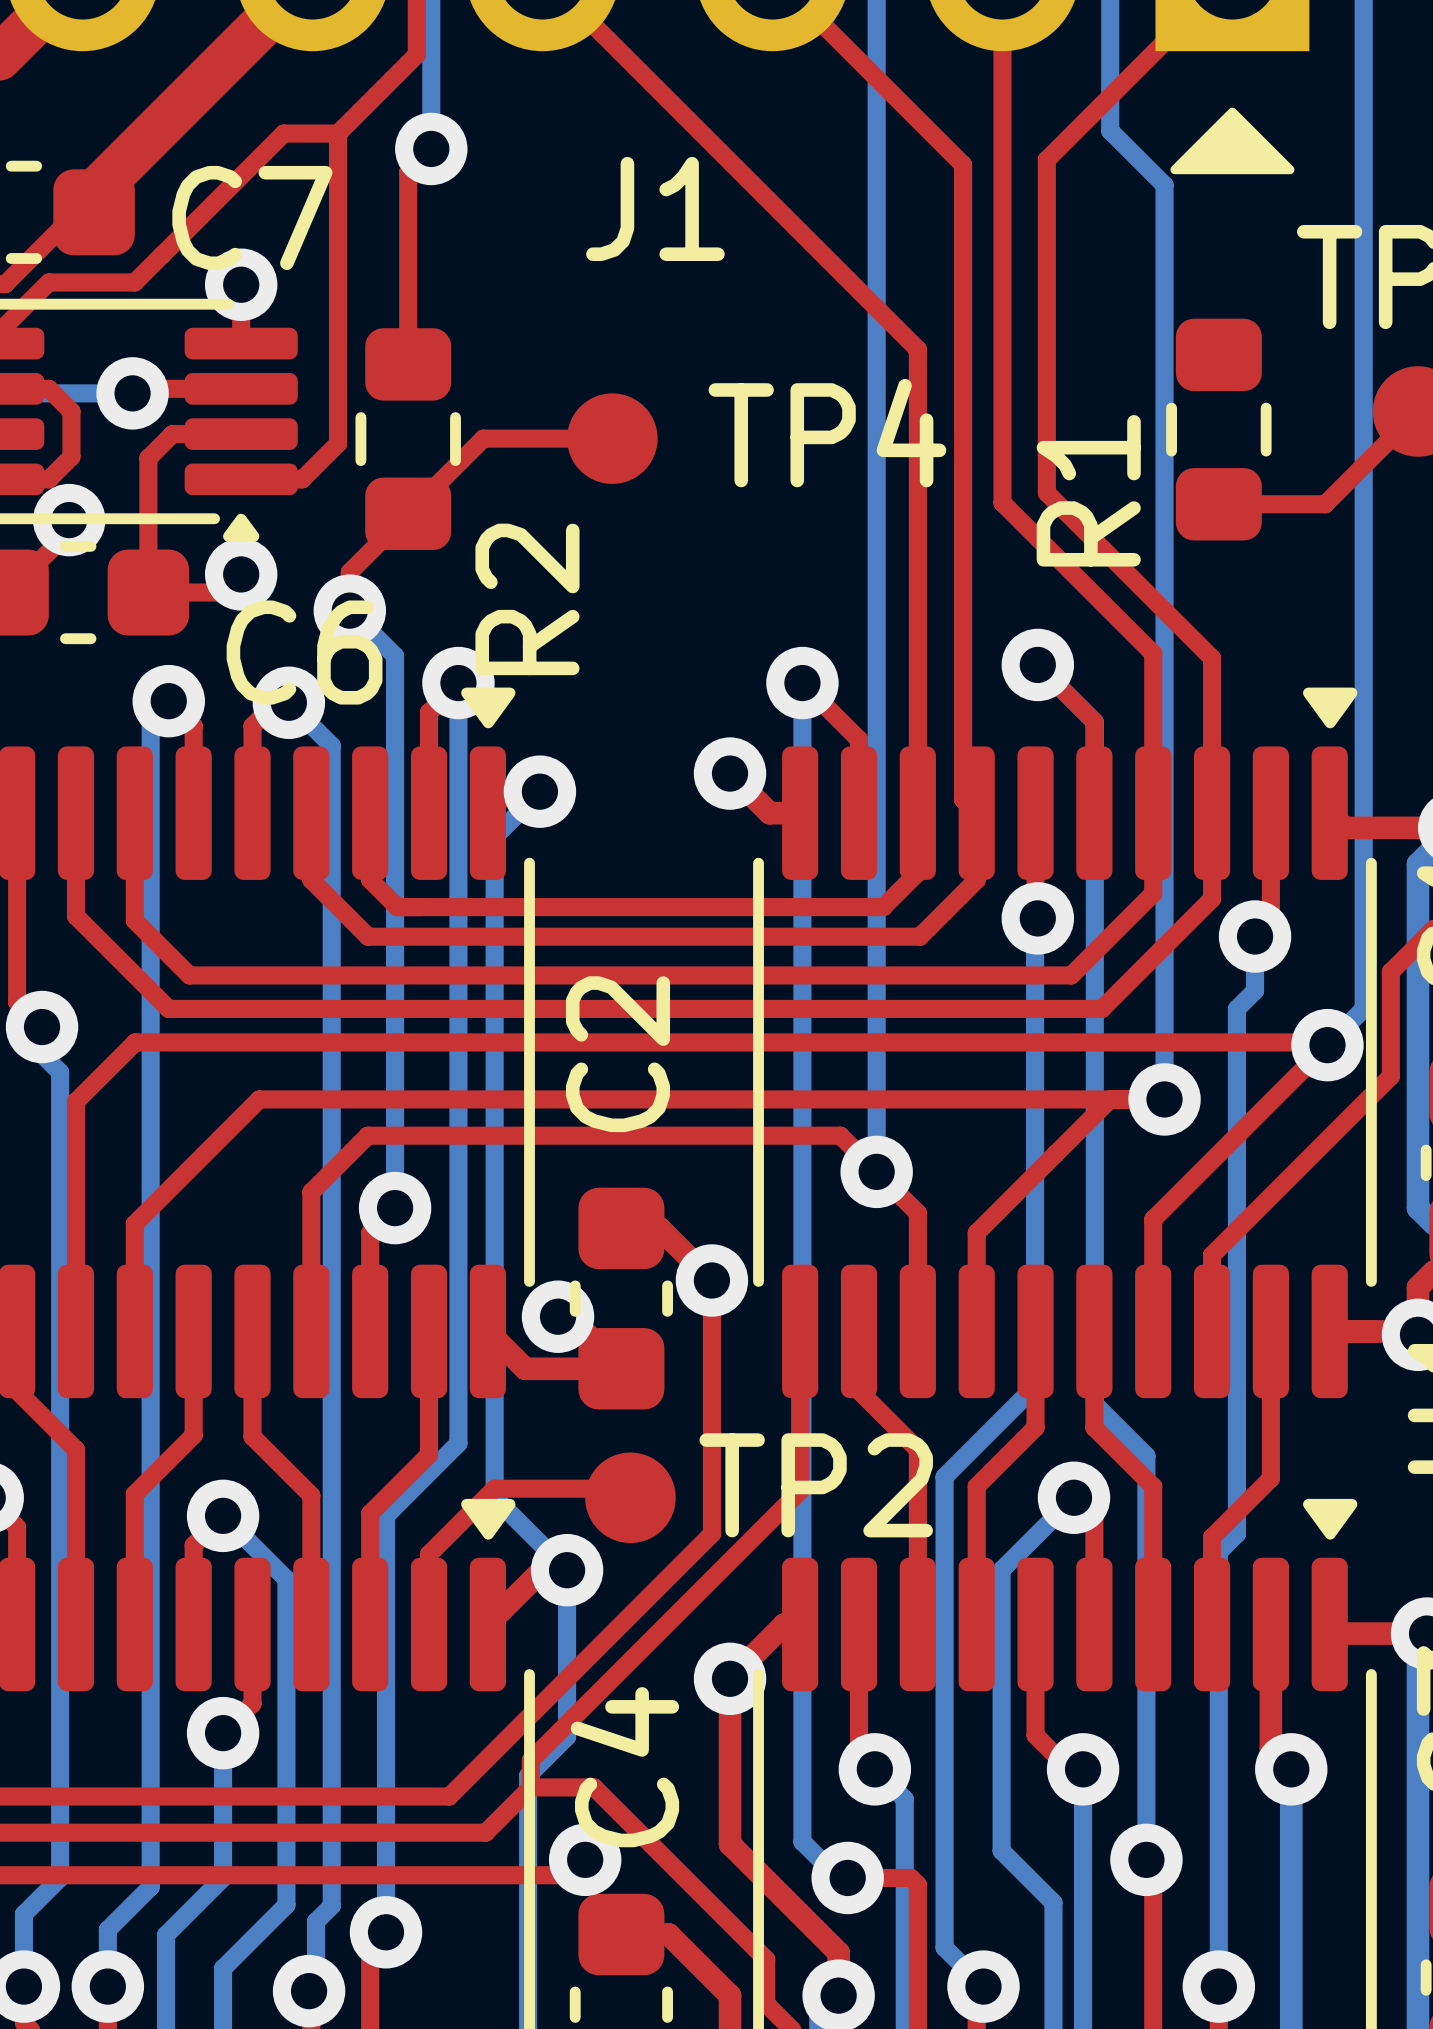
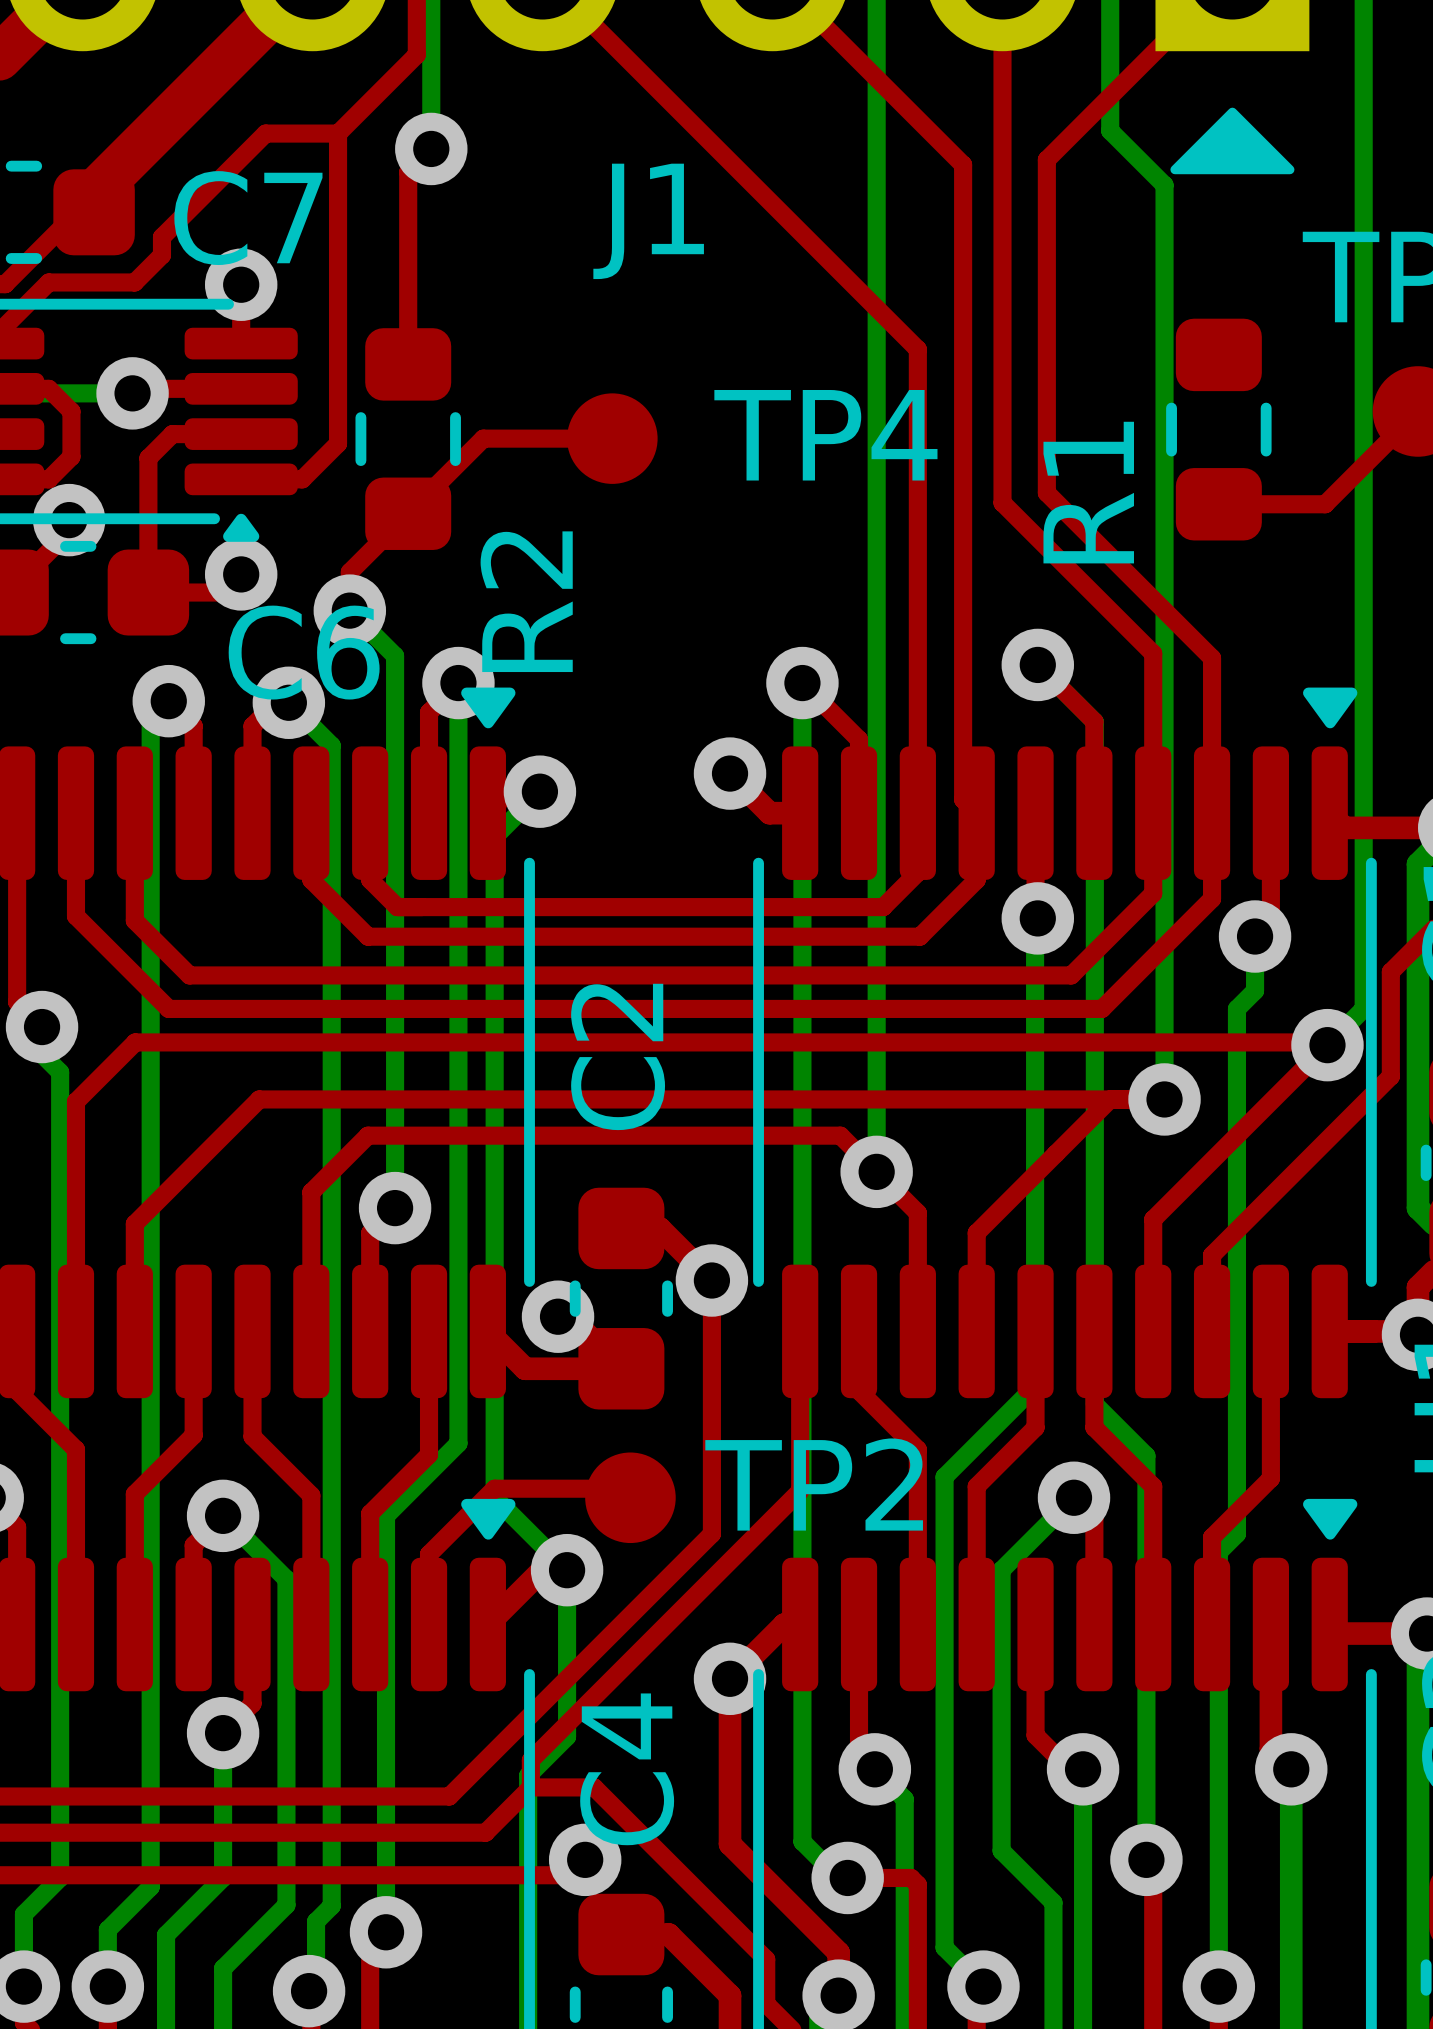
top track: (283, 133) (162, 255) -> (283, 133) (265, 133) (161, 237) (161, 255)

